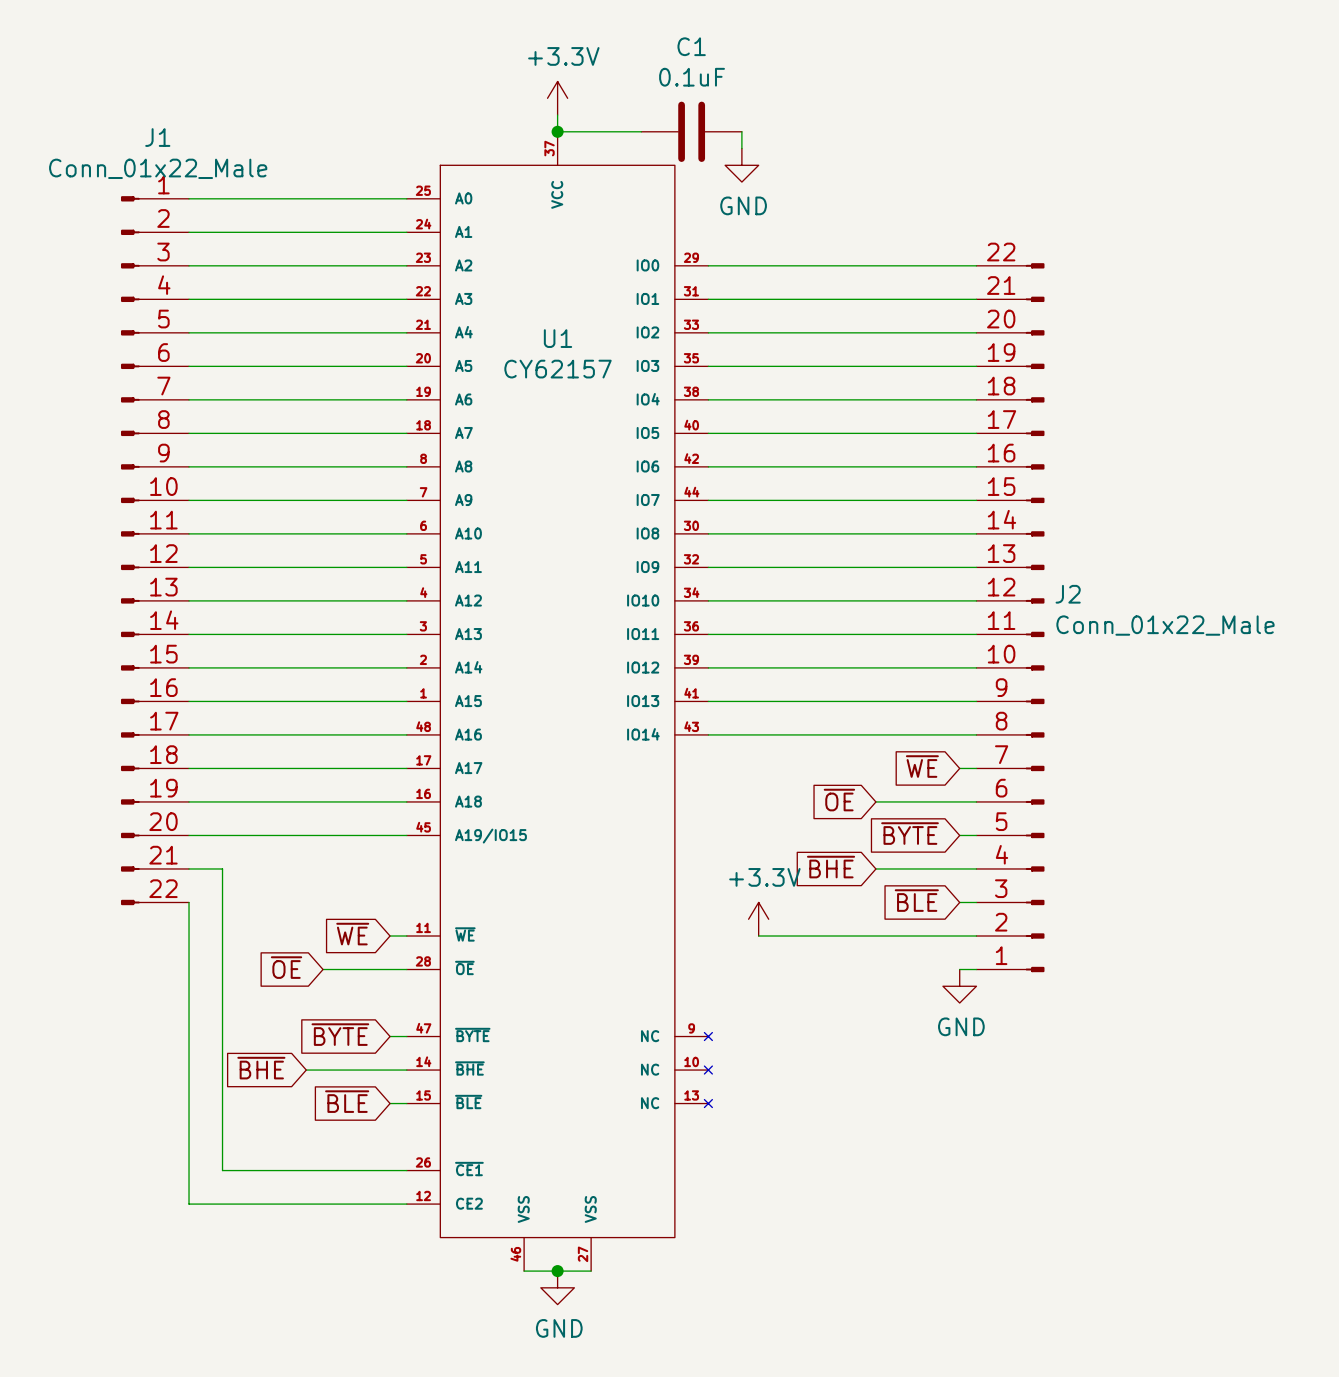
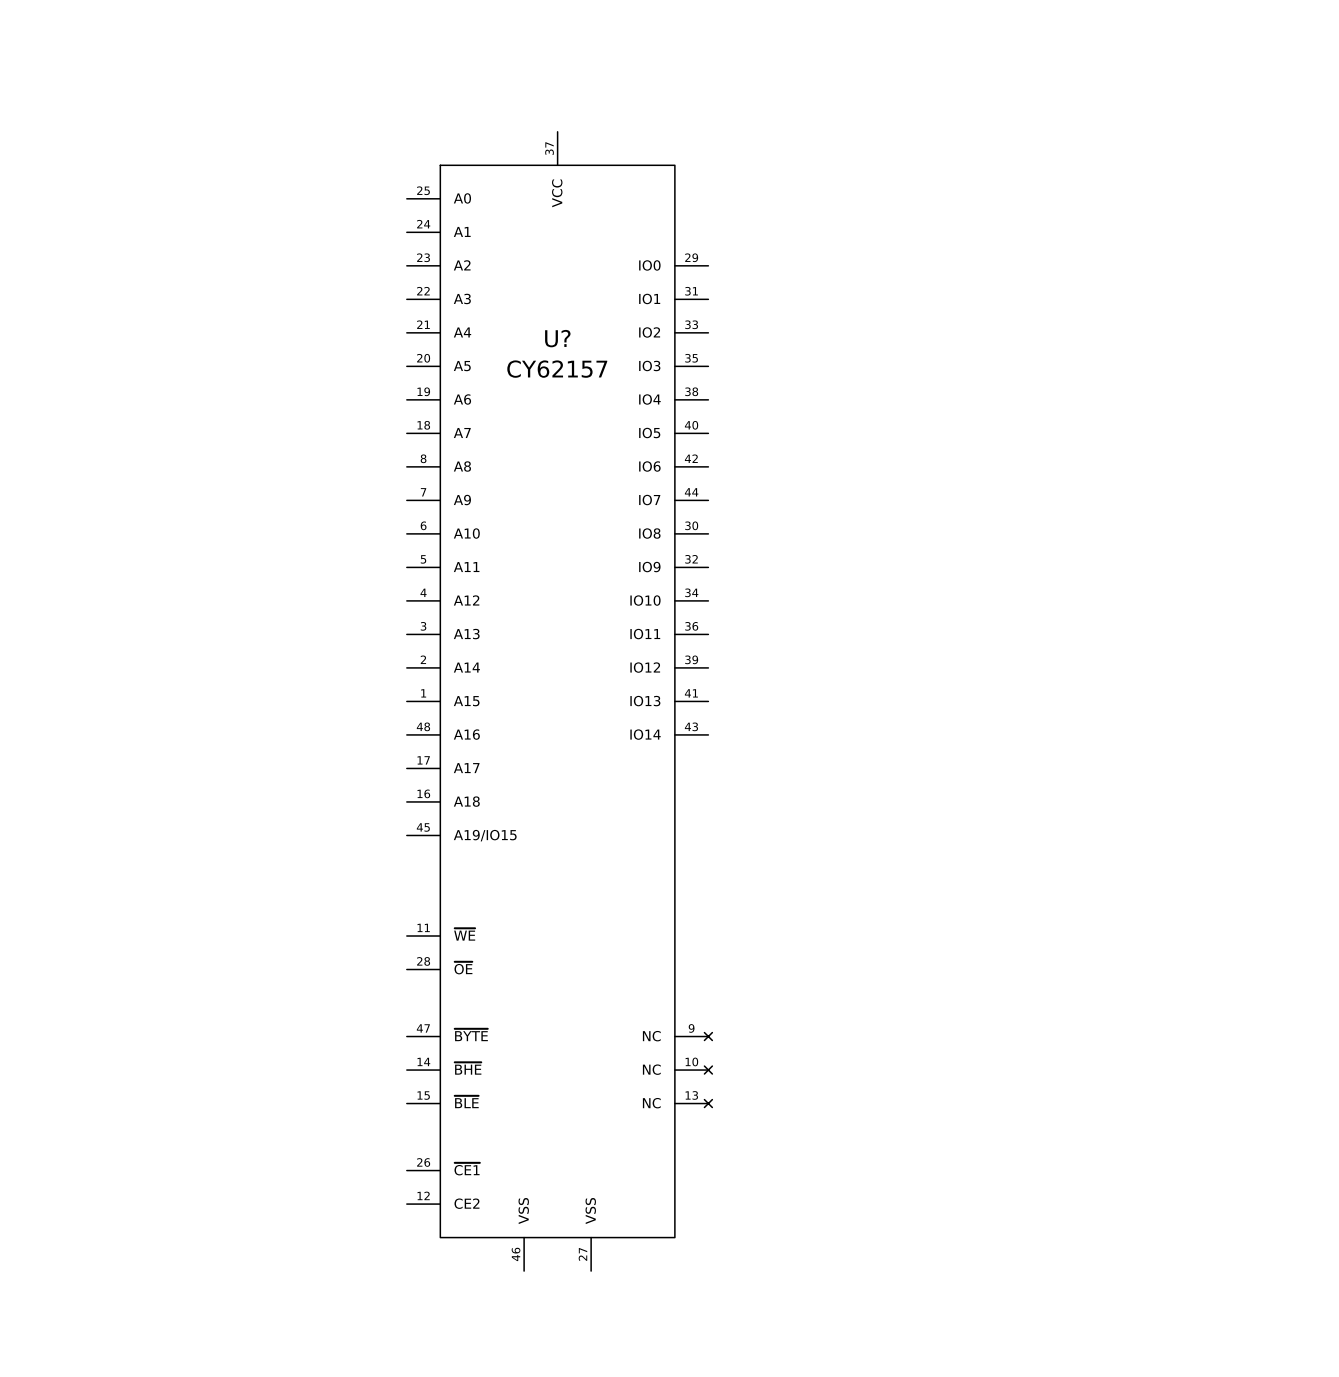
power symbol: +3.3V (557, 98) -> none
wire: (557, 115) (557, 131) (641, 131) -> none
junction: (557, 131) -> none
C1: 0.1uF (691, 131) -> none
wire: (741, 131) (741, 148) -> none
power symbol: GND (741, 165) -> none
wire: (189, 198) (406, 198) -> none
wire: (189, 232) (406, 232) -> none
wire: (189, 265) (406, 265) -> none
wire: (708, 265) (976, 265) -> none
wire: (189, 299) (406, 299) -> none
wire: (708, 299) (976, 299) -> none
wire: (189, 332) (406, 332) -> none
wire: (708, 332) (976, 332) -> none
U1 name: U1 (558, 338) -> U? (557, 338)
wire: (189, 366) (406, 366) -> none
wire: (708, 366) (976, 366) -> none
wire: (189, 399) (406, 399) -> none
wire: (708, 399) (976, 399) -> none
wire: (189, 433) (406, 433) -> none
wire: (708, 433) (976, 433) -> none
wire: (189, 466) (406, 466) -> none
wire: (708, 466) (976, 466) -> none
wire: (189, 500) (406, 500) -> none
wire: (708, 500) (976, 500) -> none
wire: (189, 533) (406, 533) -> none
wire: (708, 533) (976, 533) -> none
J1: Conn_01x22_Male (155, 550) -> none
wire: (189, 567) (406, 567) -> none
wire: (708, 567) (976, 567) -> none
wire: (189, 600) (406, 600) -> none
wire: (708, 600) (976, 600) -> none
J2: Conn_01x22_Male (1010, 617) -> none
wire: (189, 634) (406, 634) -> none
wire: (708, 634) (976, 634) -> none
wire: (189, 667) (406, 667) -> none
wire: (708, 667) (976, 667) -> none
wire: (189, 701) (406, 701) -> none
wire: (708, 701) (976, 701) -> none
wire: (189, 734) (406, 734) -> none
wire: (708, 734) (976, 734) -> none
global label: ~{WE} (922, 766) -> none
wire: (189, 768) (406, 768) -> none
wire: (959, 768) (976, 768) -> none
global label: ~{OE} (839, 800) -> none
wire: (189, 801) (406, 801) -> none
wire: (875, 801) (976, 801) -> none
global label: ~{BYTE} (910, 833) -> none
wire: (189, 835) (406, 835) -> none
wire: (959, 835) (976, 835) -> none
global label: ~{BHE} (831, 867) -> none
wire: (189, 868) (222, 868) (222, 1170) (406, 1170) -> none
wire: (875, 868) (976, 868) -> none
global label: ~{BLE} (916, 900) -> none
wire: (189, 902) (189, 1204) (406, 1204) -> none
wire: (959, 902) (976, 902) -> none
power symbol: +3.3V (758, 919) -> none
global label: ~{WE} (352, 934) -> none
wire: (390, 936) (406, 936) -> none
wire: (758, 936) (976, 936) -> none
global label: ~{OE} (286, 967) -> none
wire: (323, 969) (406, 969) -> none
wire: (959, 969) (976, 969) -> none
power symbol: GND (959, 986) -> none
global label: ~{BYTE} (340, 1034) -> none
wire: (390, 1036) (406, 1036) -> none
global label: ~{BHE} (261, 1068) -> none
wire: (306, 1070) (406, 1070) -> none
global label: ~{BLE} (347, 1101) -> none
wire: (390, 1103) (406, 1103) -> none
wire: (524, 1271) (591, 1271) -> none
junction: (557, 1271) -> none
power symbol: GND (557, 1287) -> none

